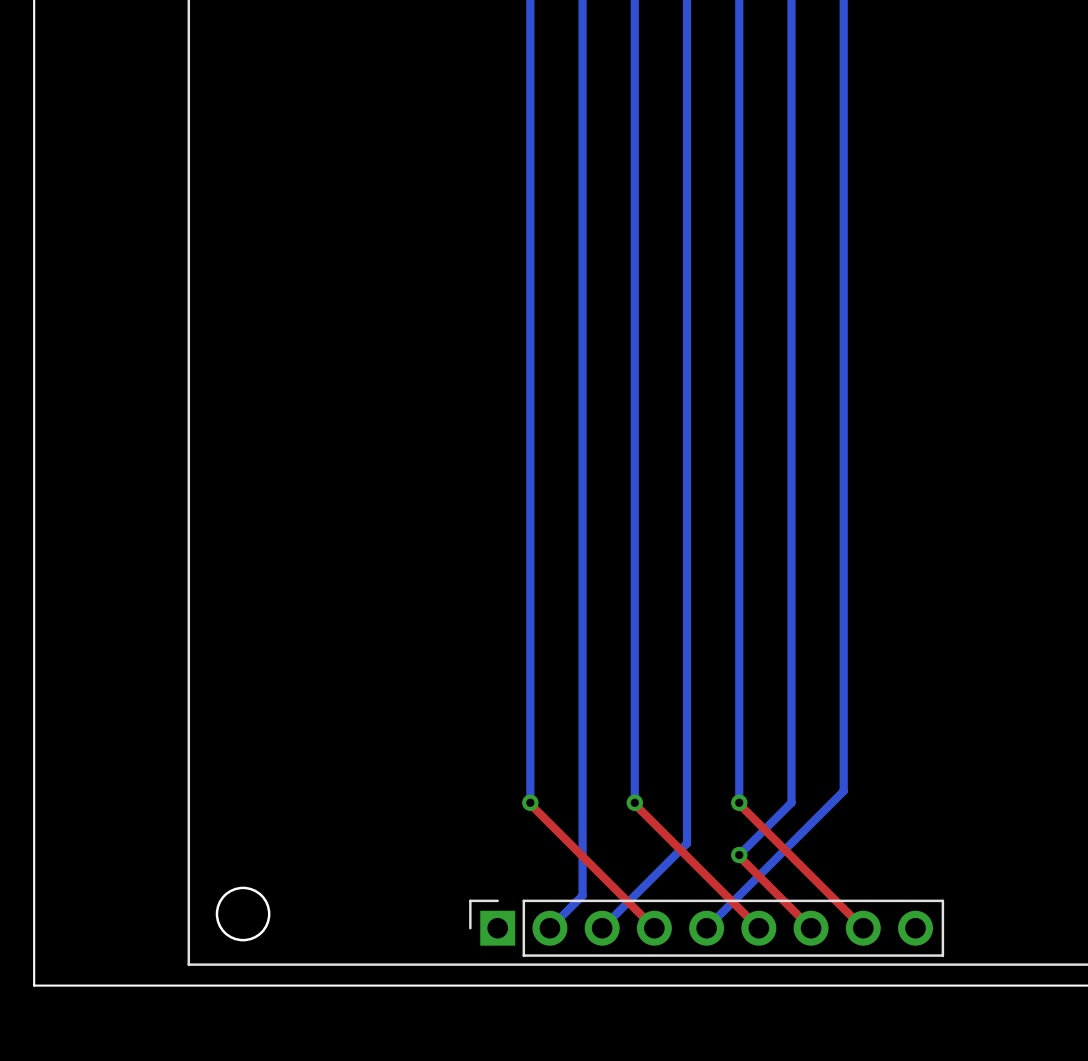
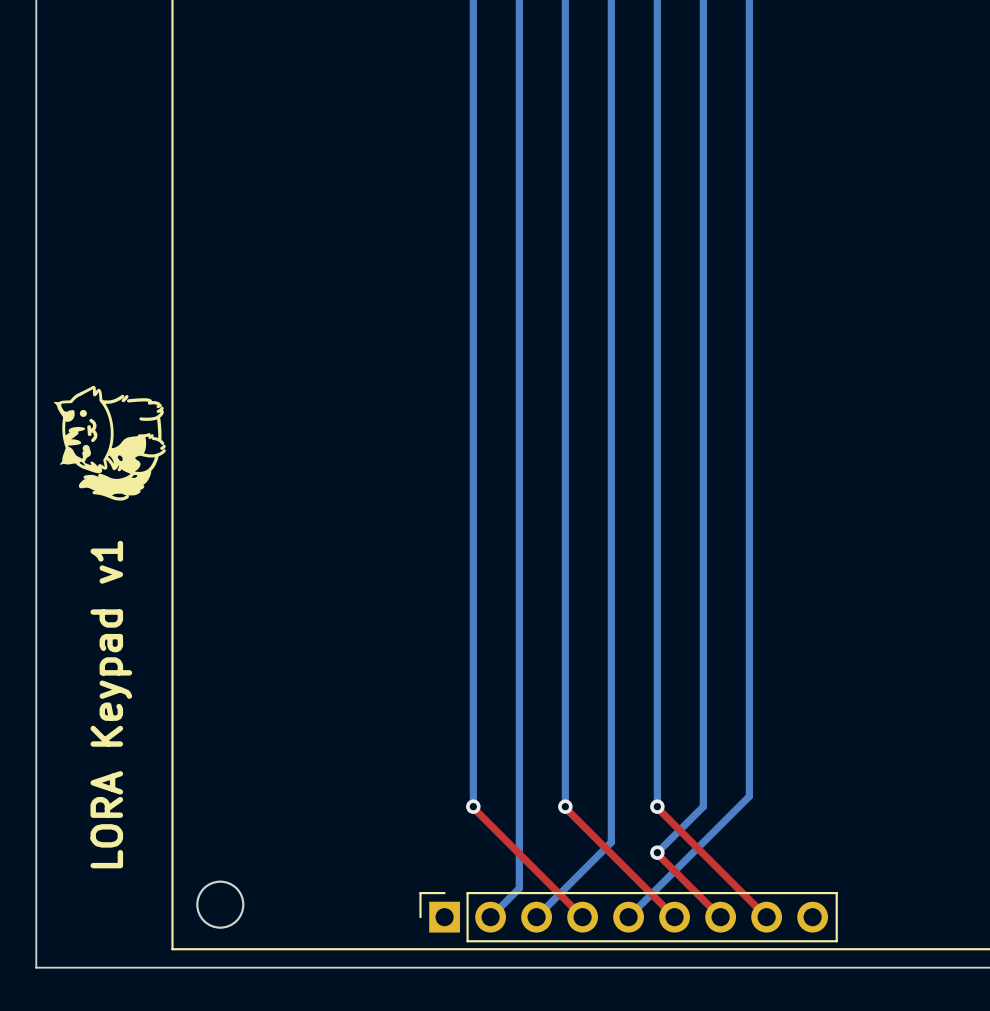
drawing: none -> [54, 385, 166, 501]
text: none -> LORA Keypad v1 (111, 704)

